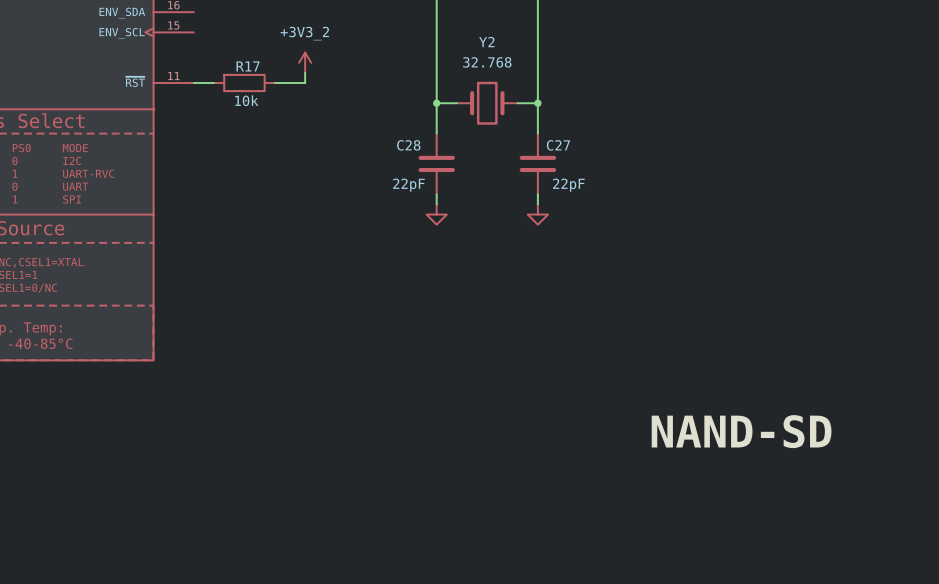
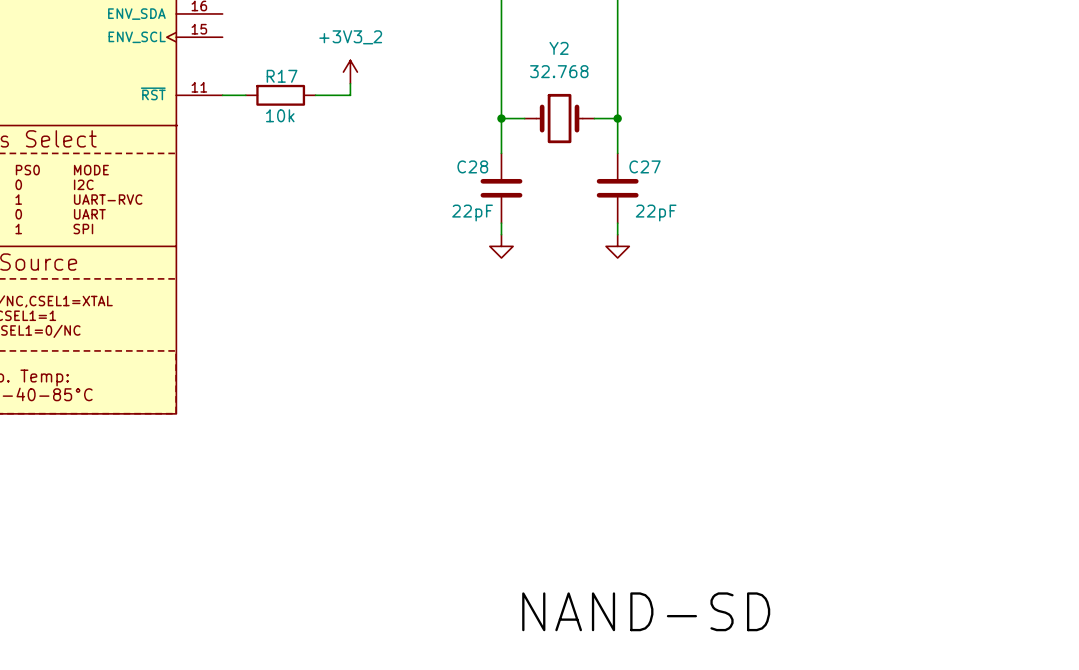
label: NAND-SD (741, 431) -> none
label: none -> NAND-SD (646, 611)

